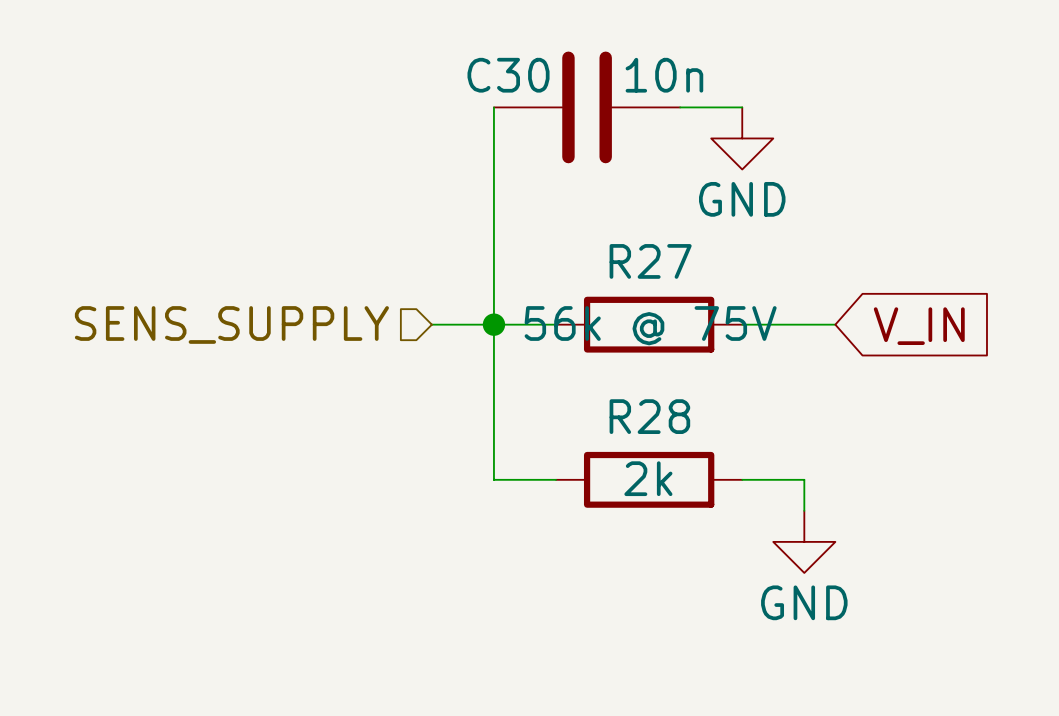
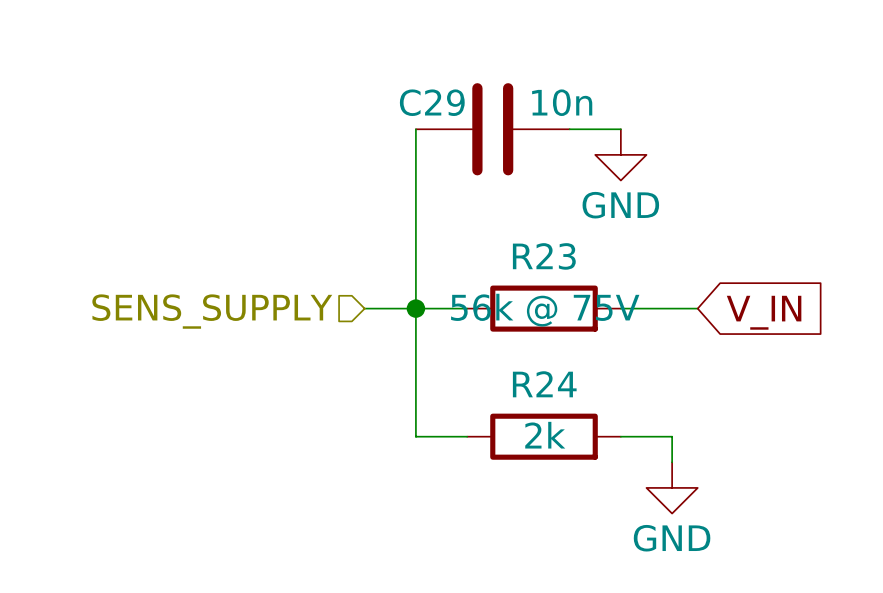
C30 name: C30 (508, 75) -> C29 (432, 102)
R27 name: R27 (650, 261) -> R23 (544, 256)
R28 name: R28 (649, 416) -> R24 (544, 384)

